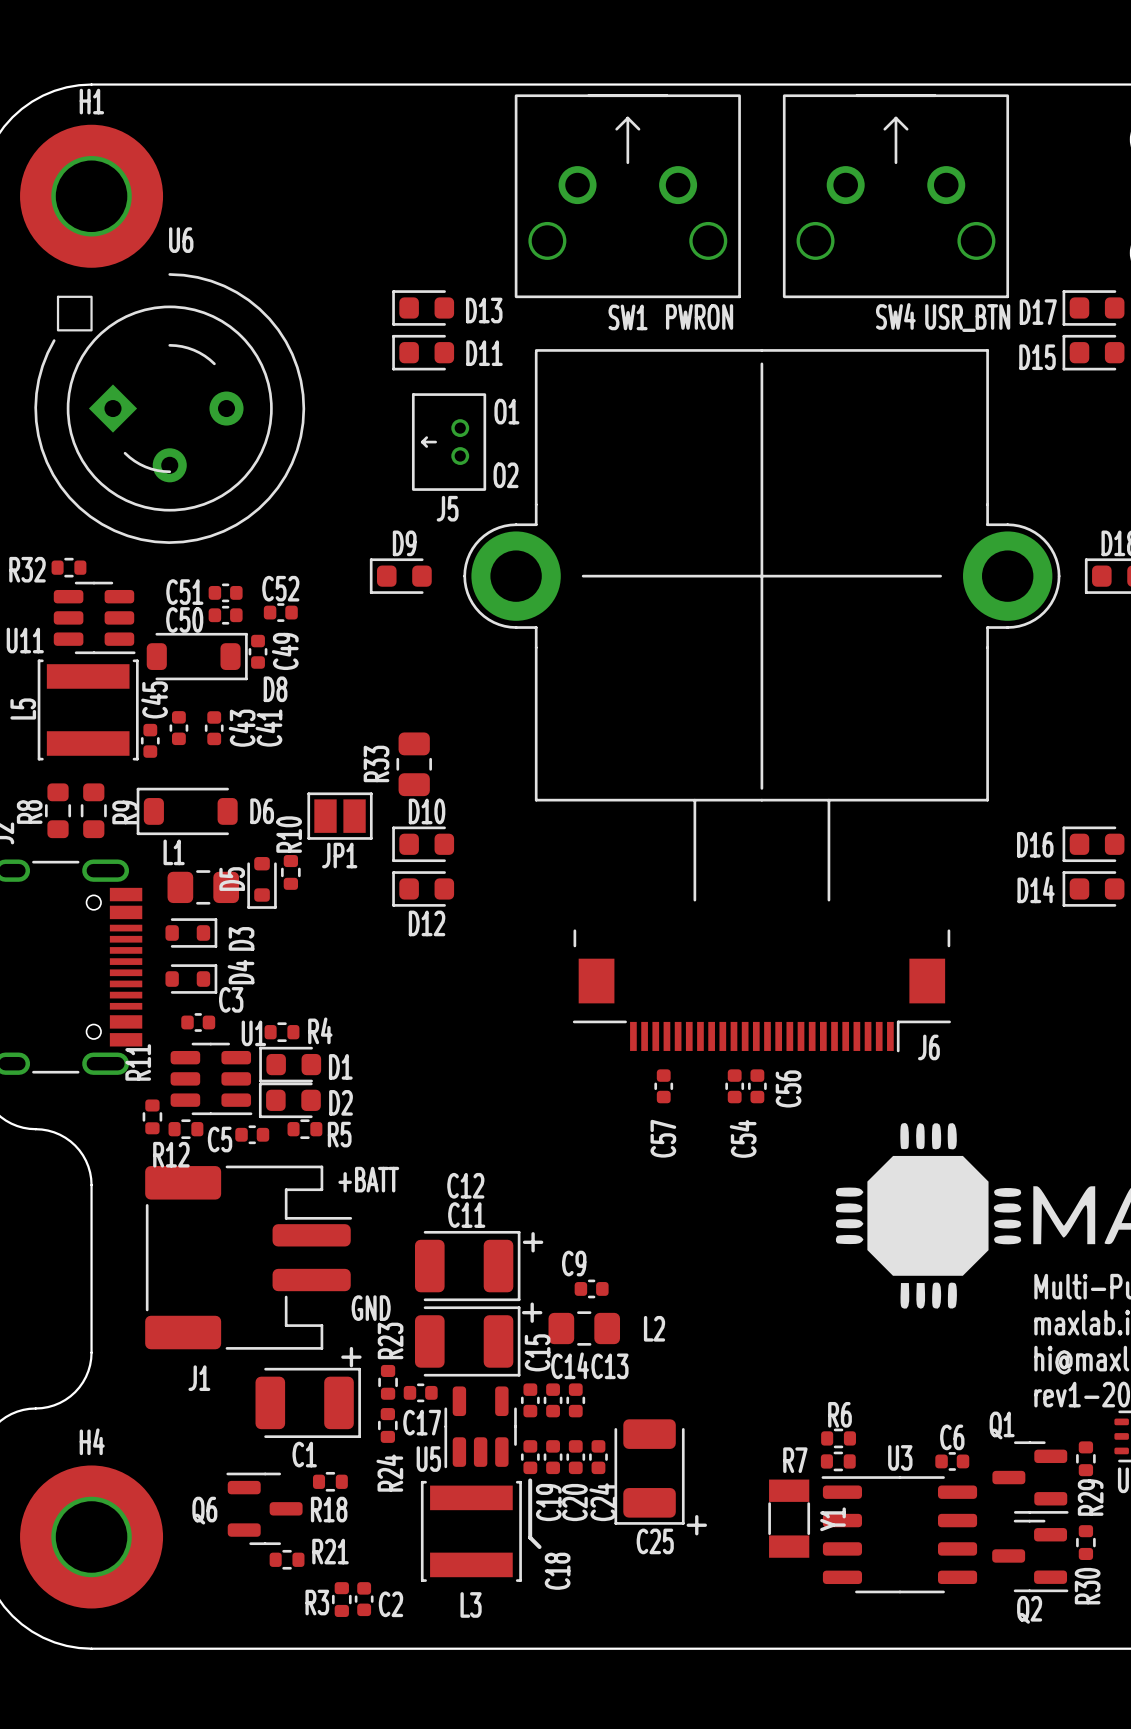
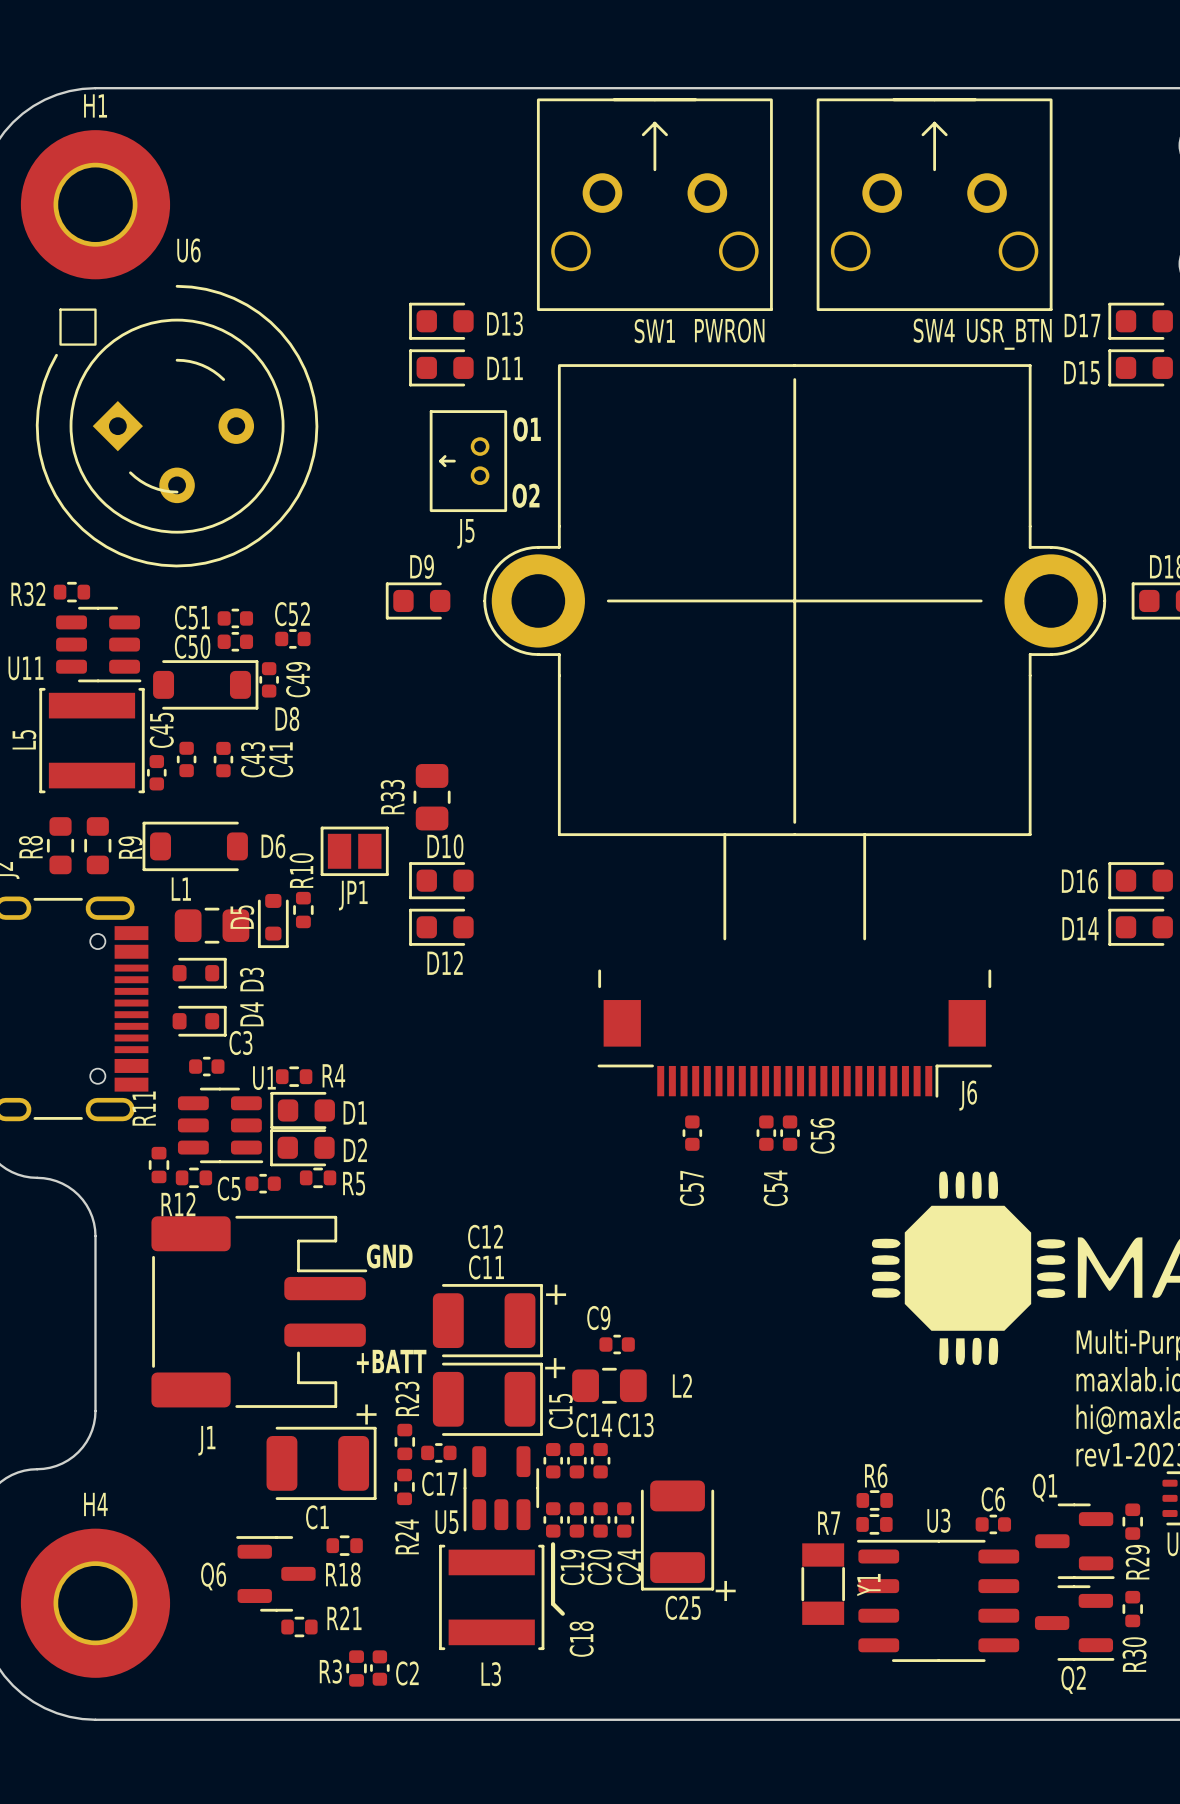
text: +BATT (368, 1179) -> none
text: none -> GND (389, 1256)
text: GND (371, 1308) -> +BATT (391, 1361)

